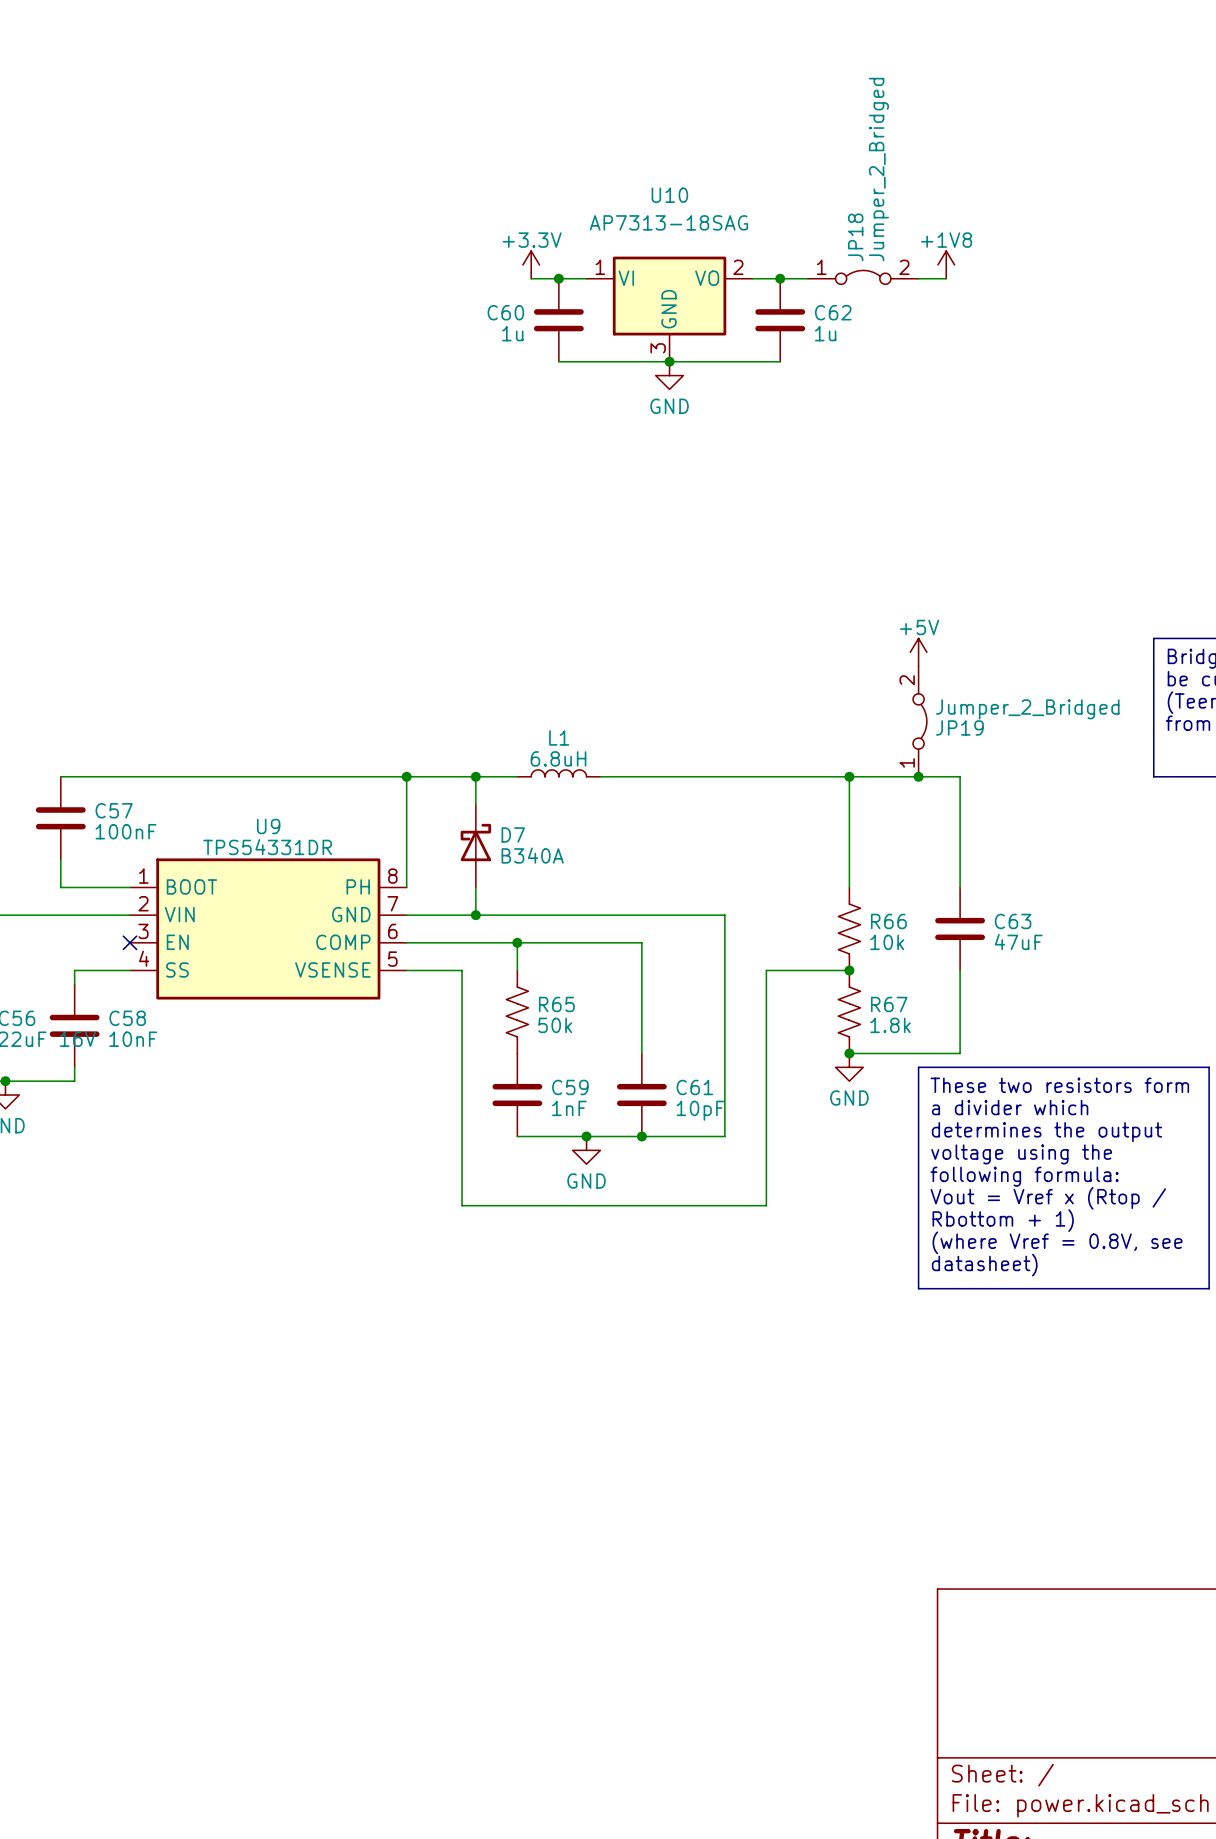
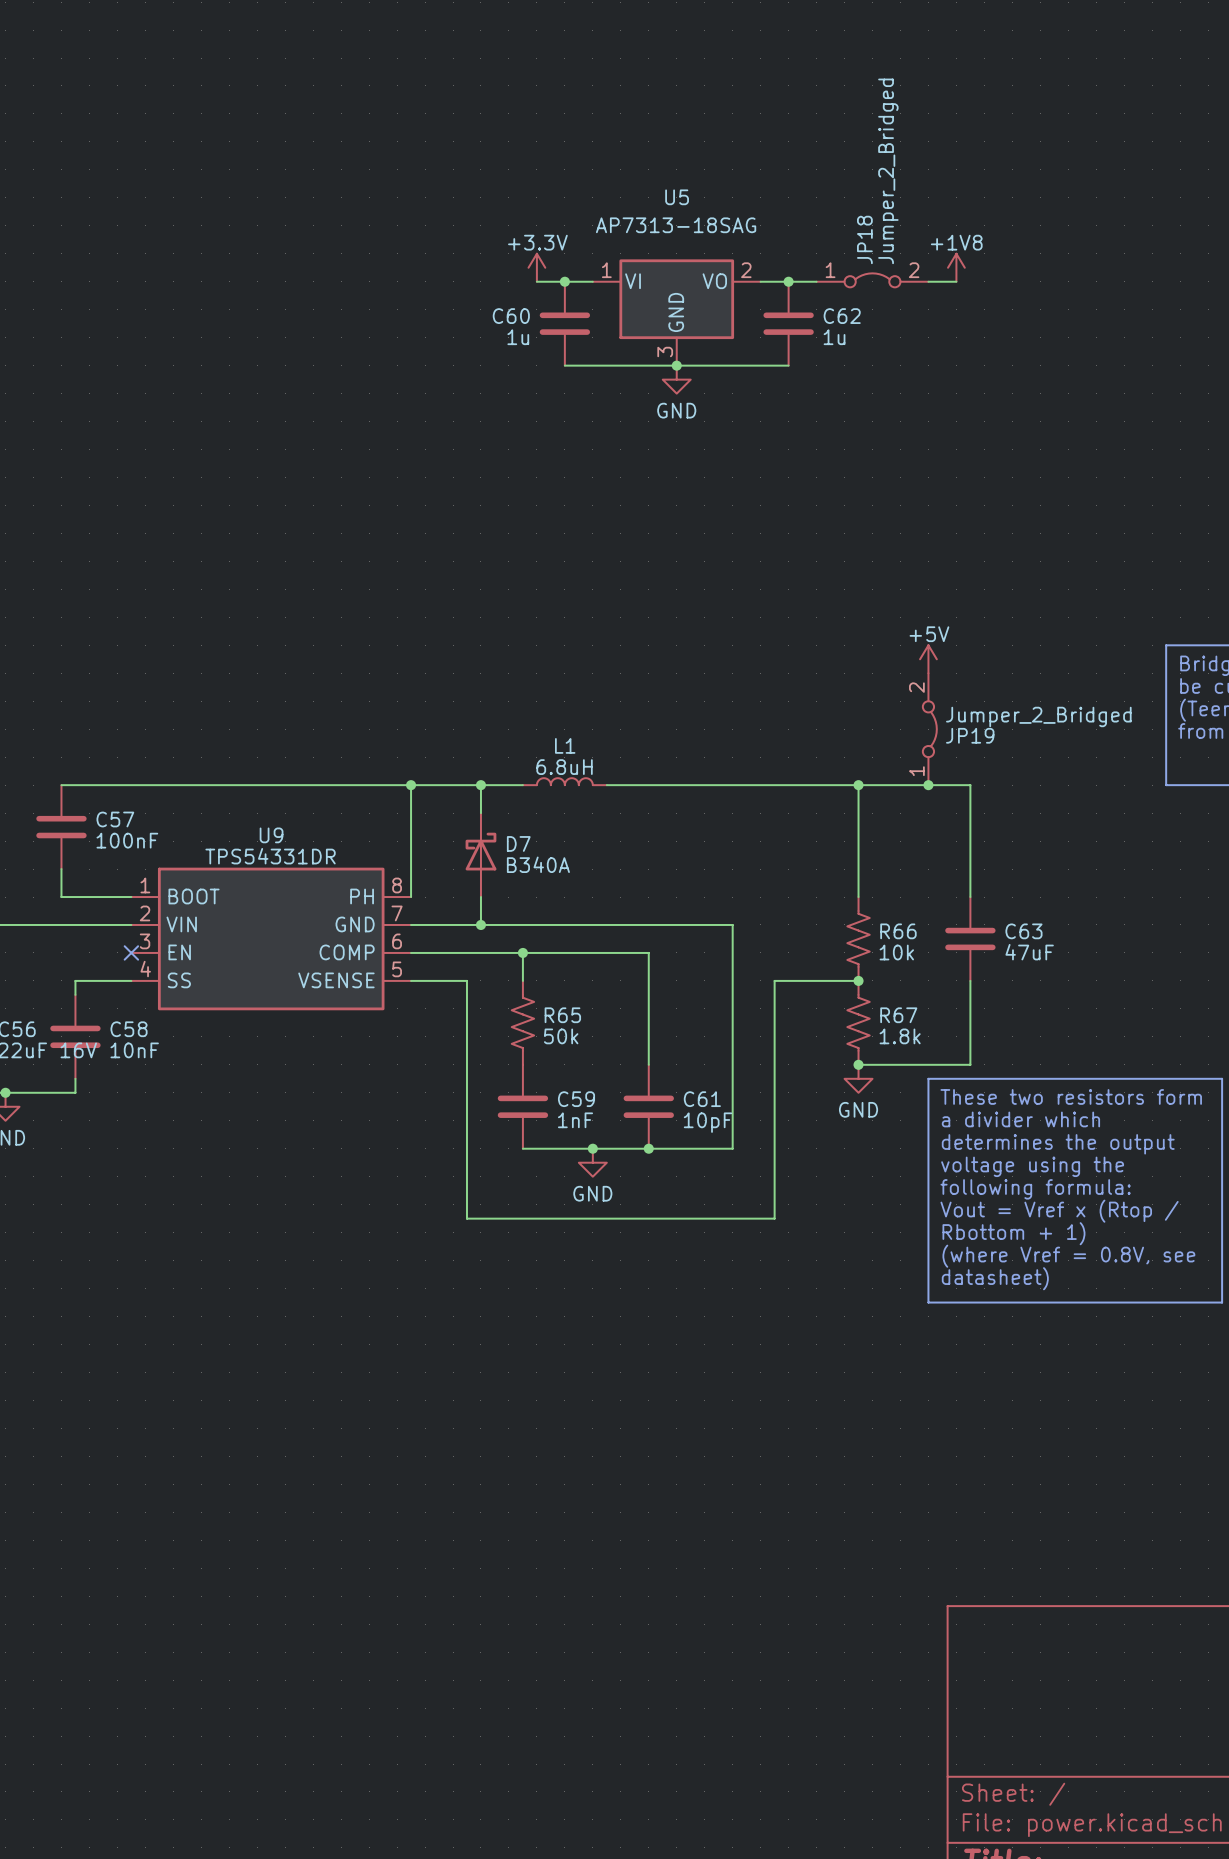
U10 name: U10 (669, 195) -> U5 (677, 197)

